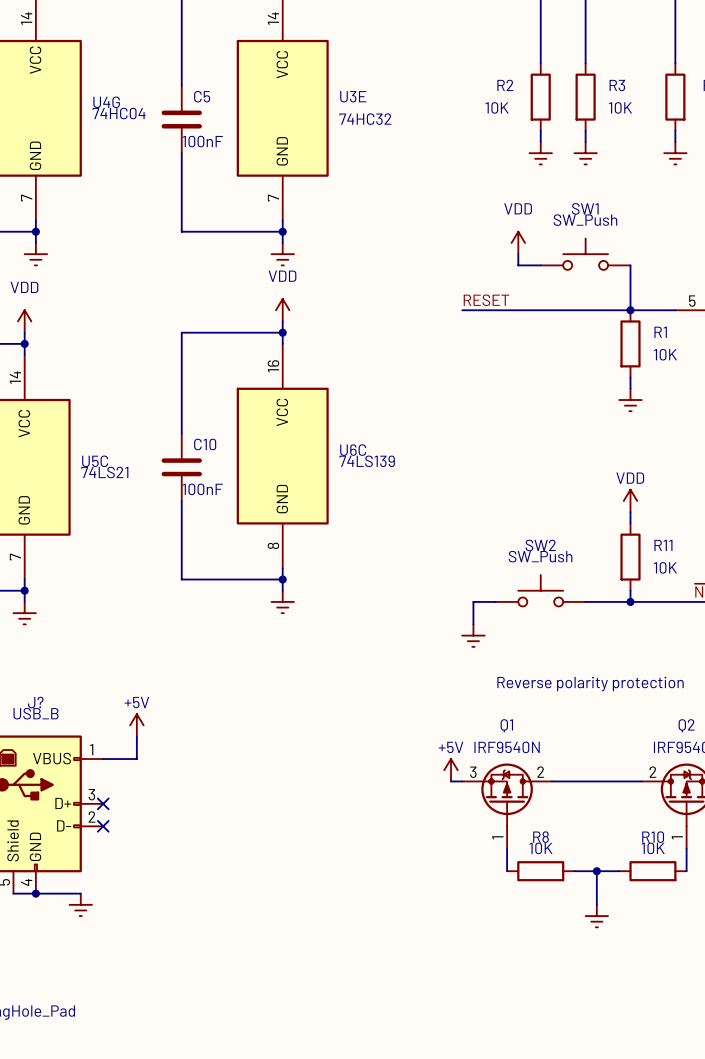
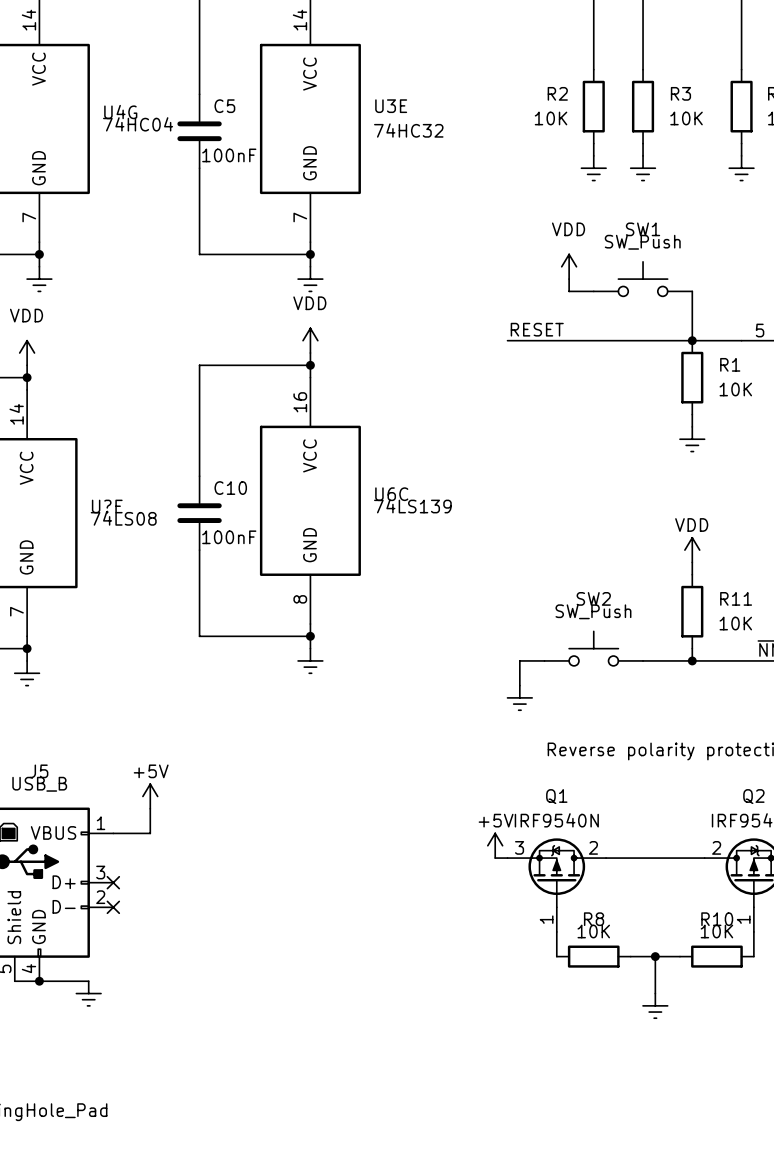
U5C name: U5C (95, 461) -> U?E (107, 506)
U5C value: 74LS21 (104, 472) -> 74LS08 (123, 518)
J? name: J? (35, 702) -> J5 (39, 771)

